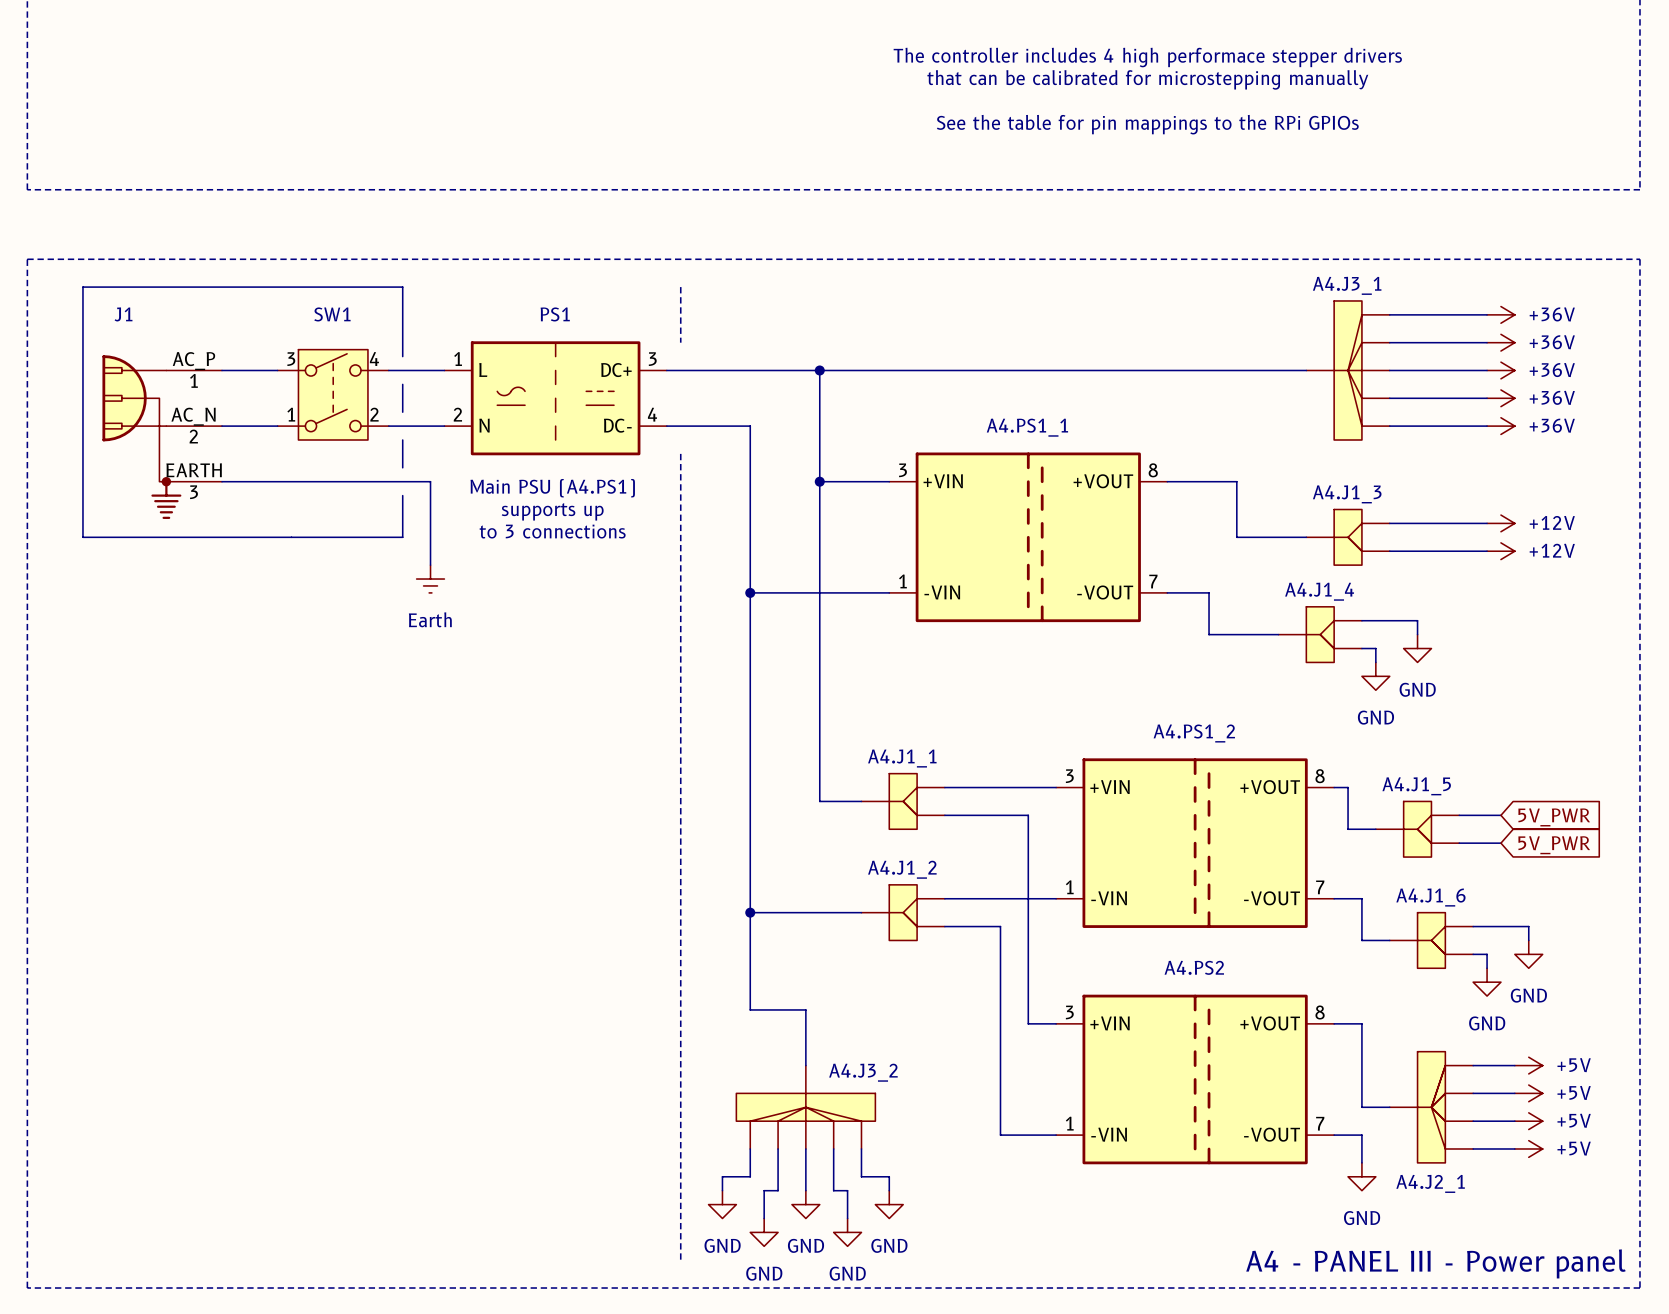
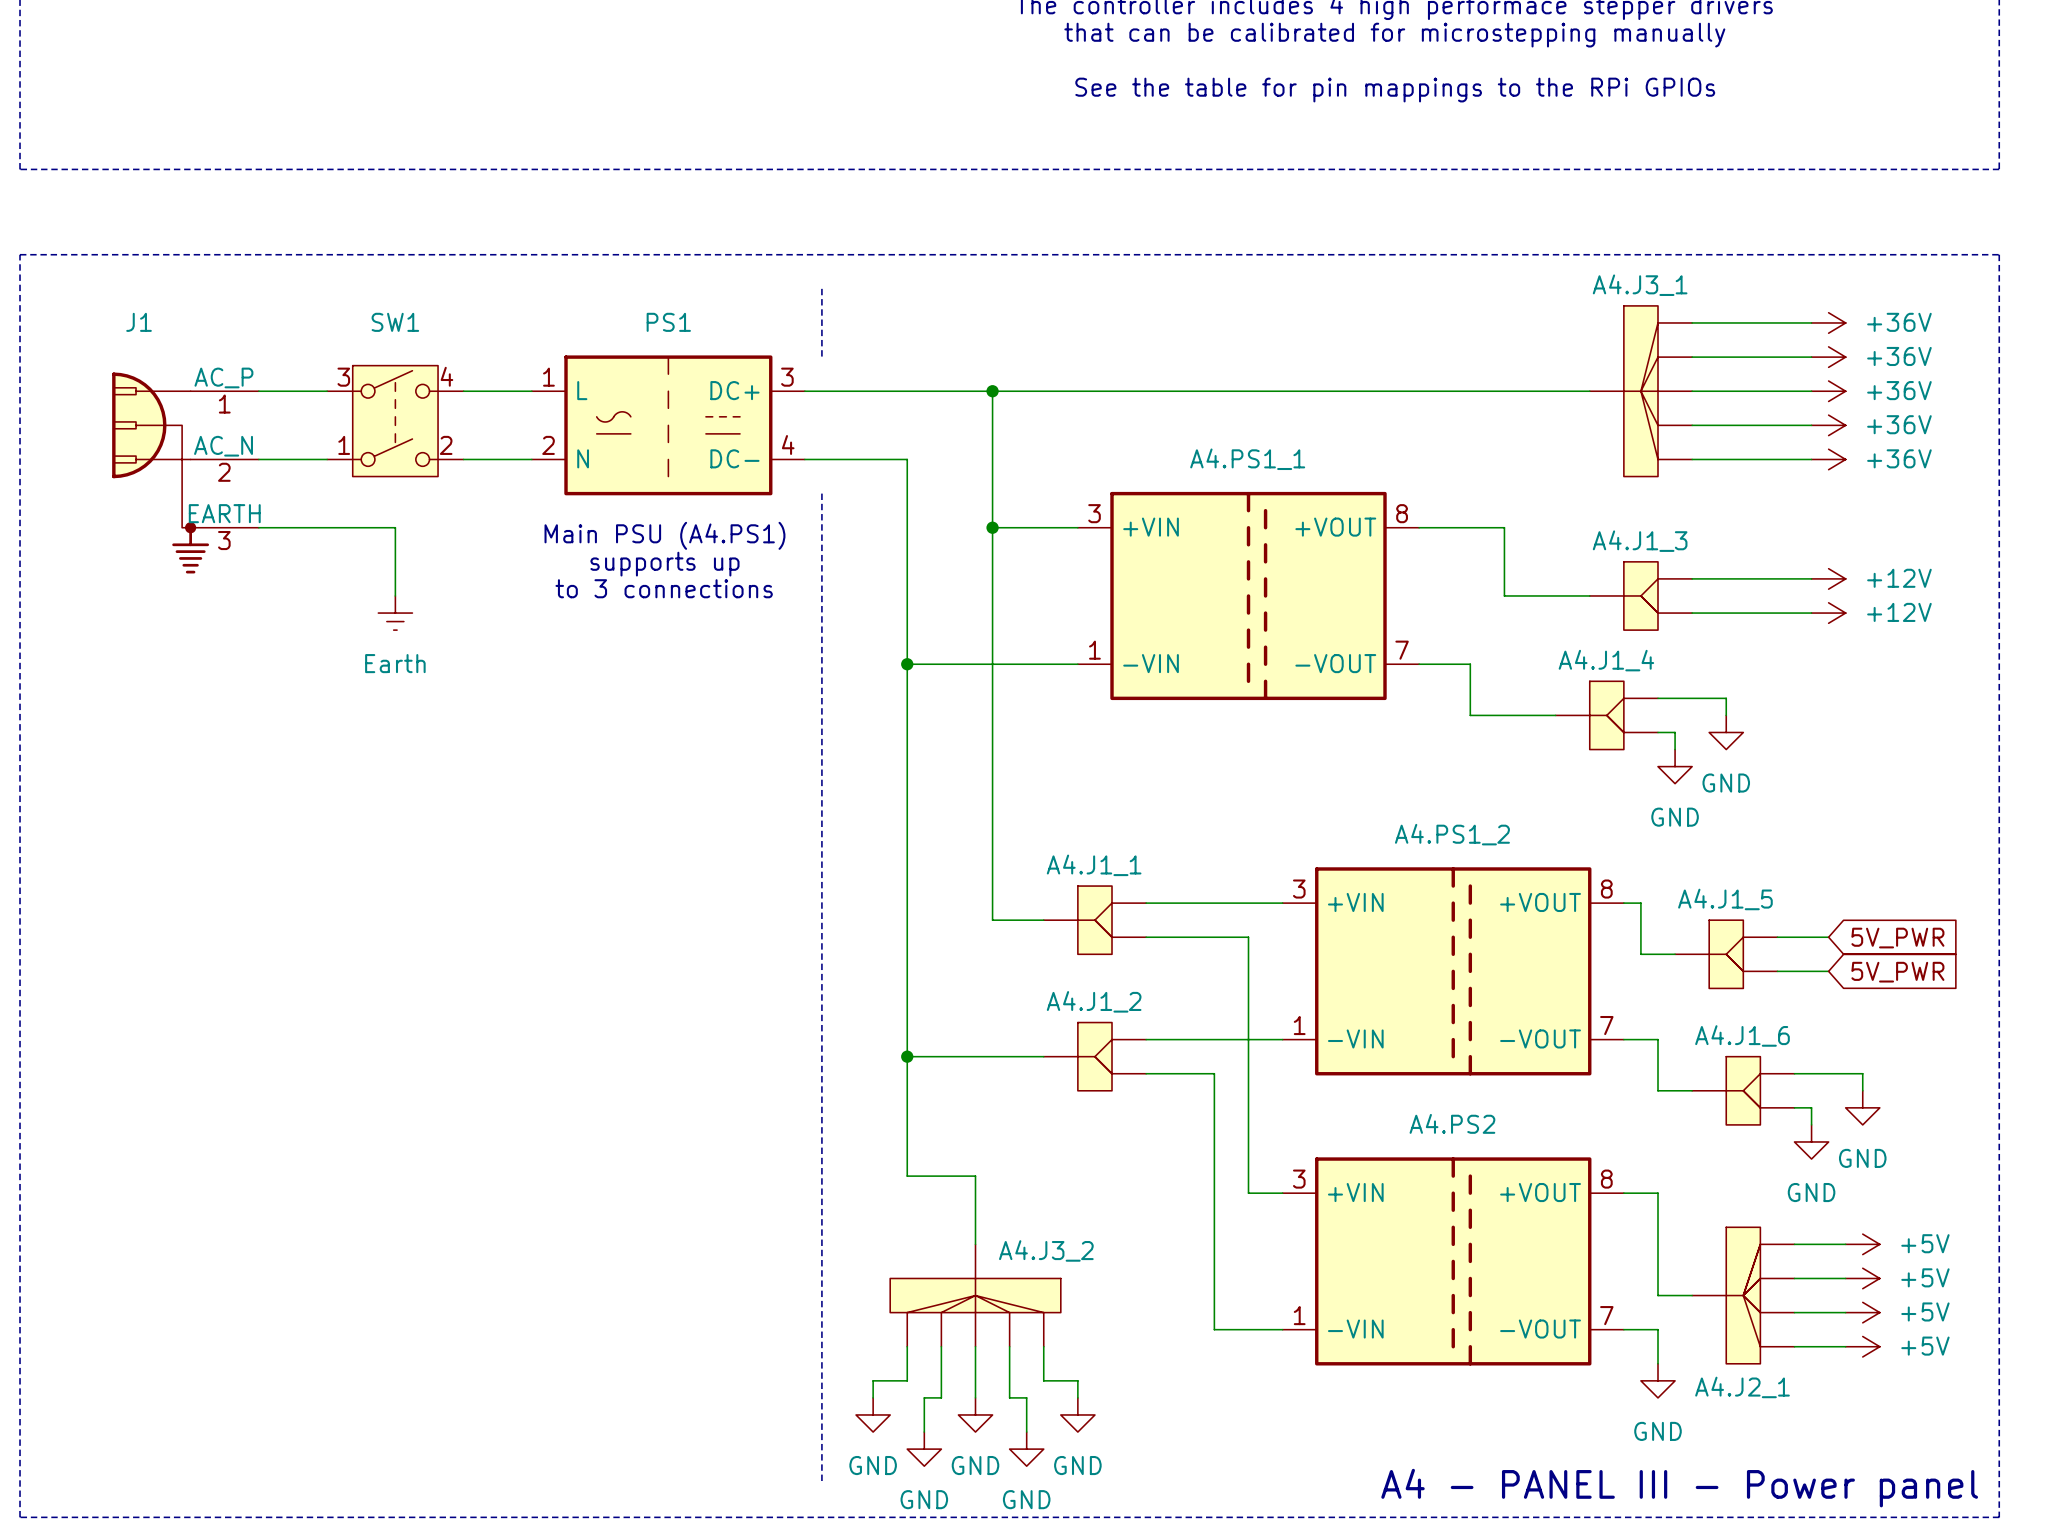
line: (402, 356) (402, 287) (82, 287) (82, 537) (402, 537) (402, 495) -> none
line: (402, 384) (402, 412) -> none
line: (402, 440) (402, 467) -> none
wire: (333, 481) (430, 481) (430, 565) -> (395, 527) (395, 595)
power symbol position: Earth (430, 579) -> Earth (395, 613)

